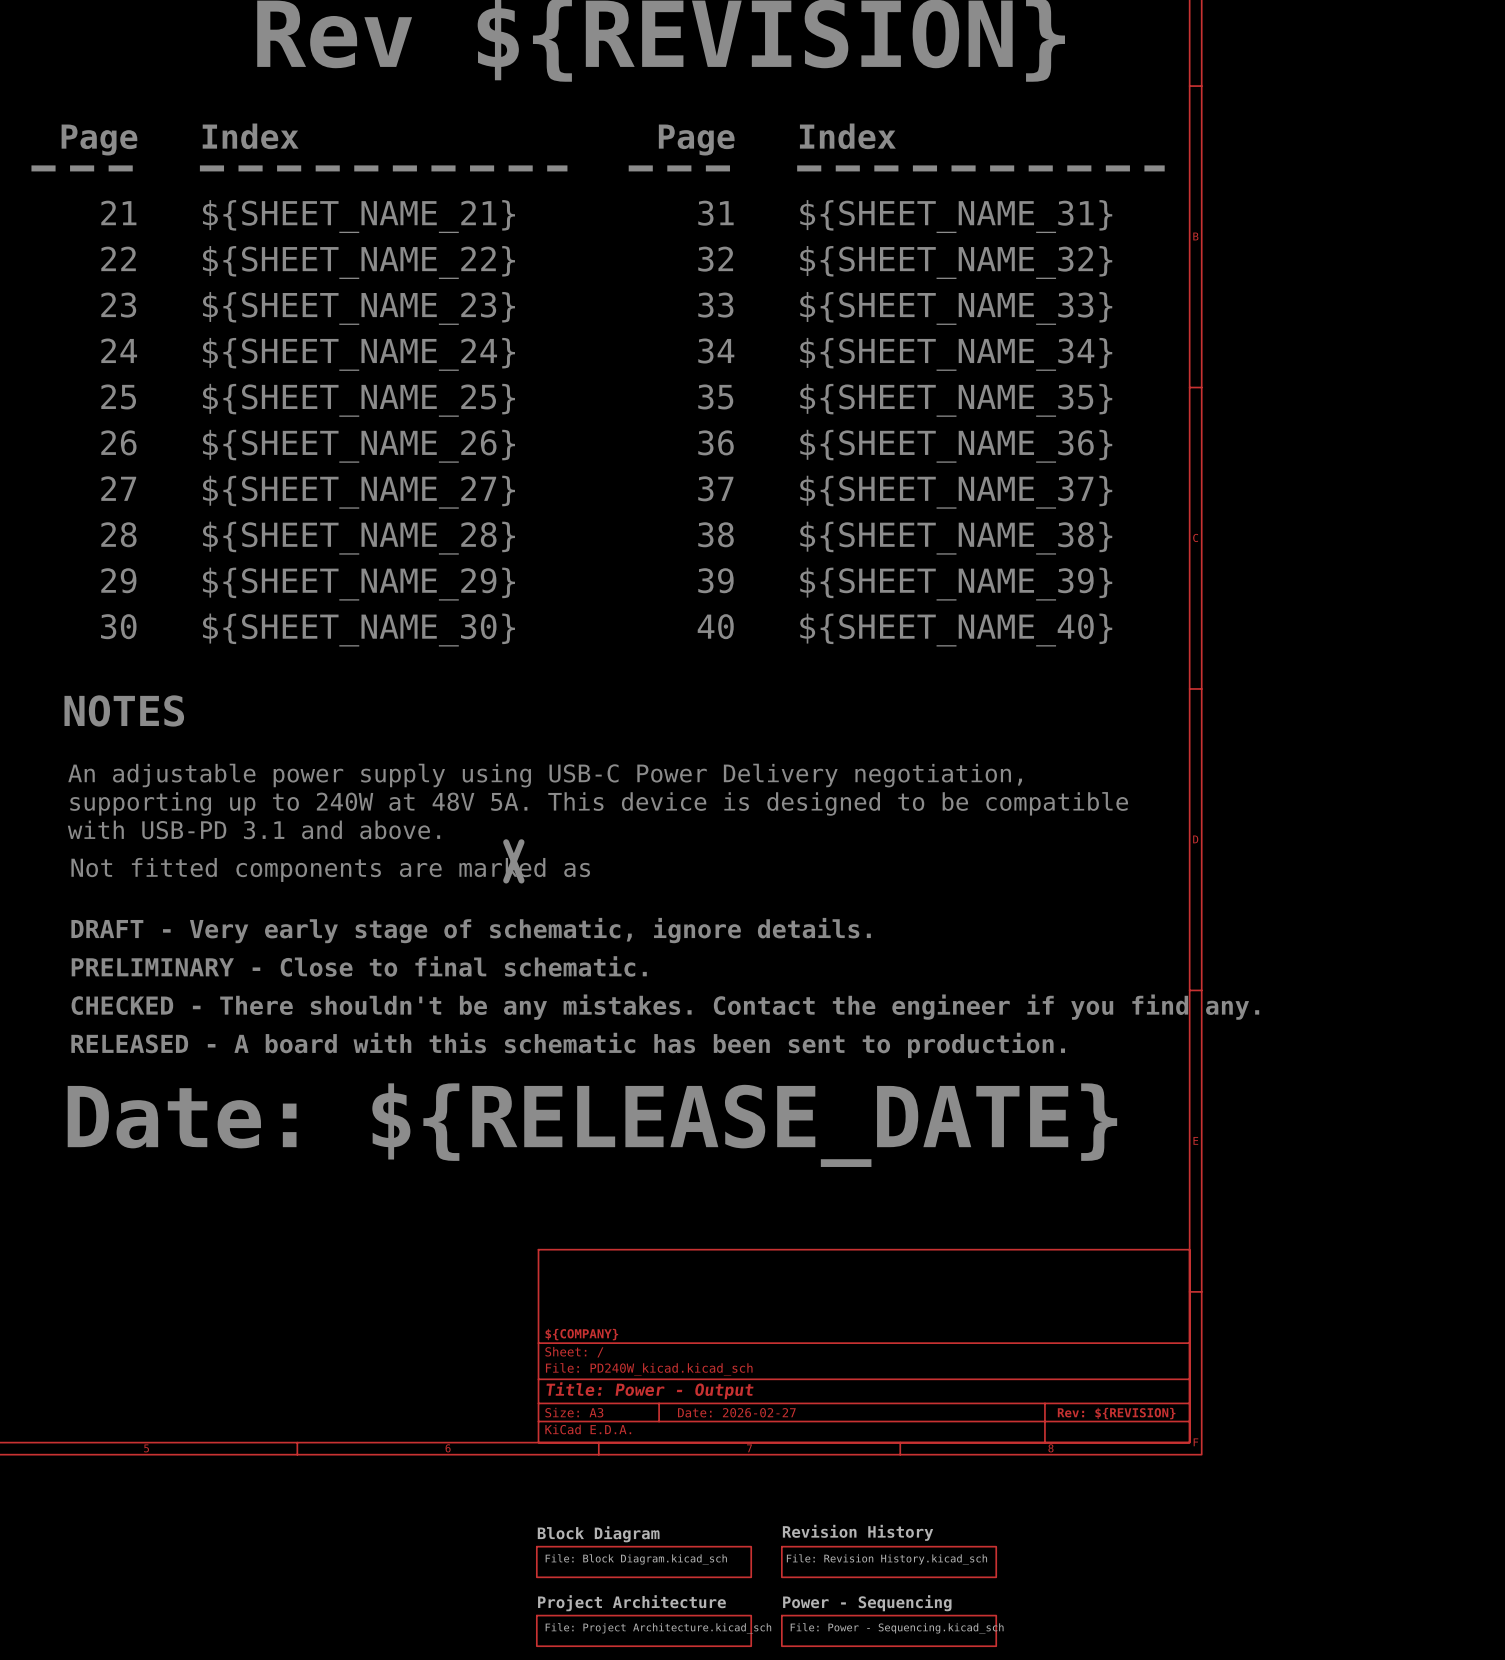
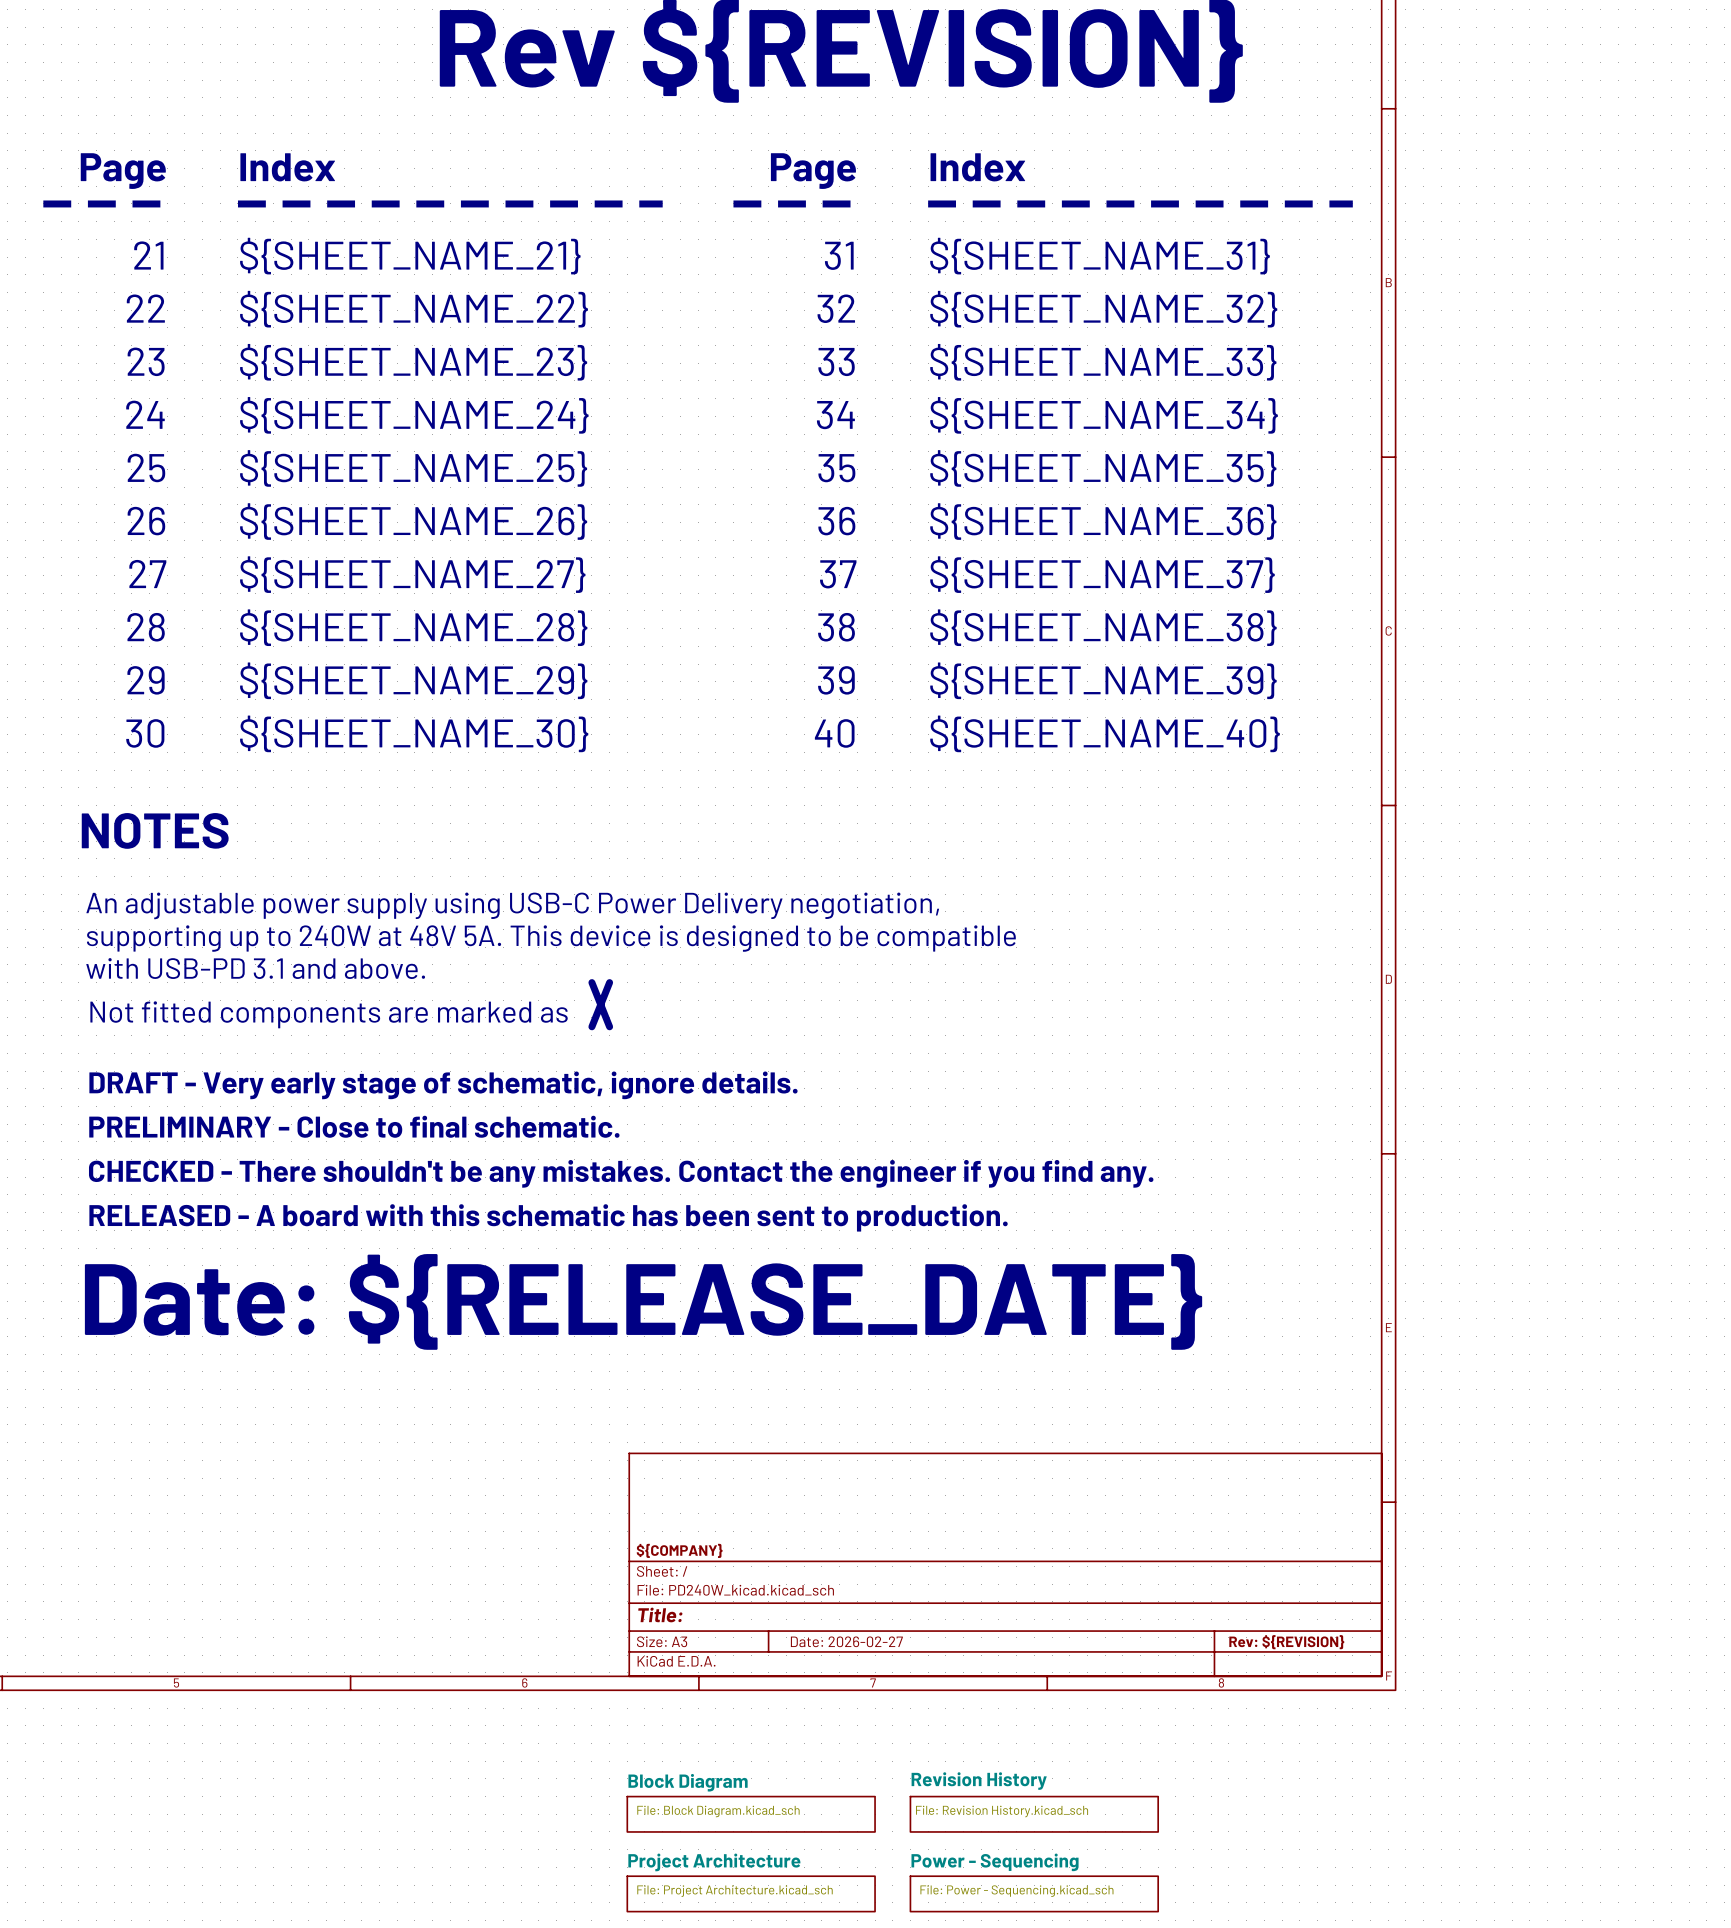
title block: Title: Power - Output (649, 1390) -> Title: (660, 1614)

